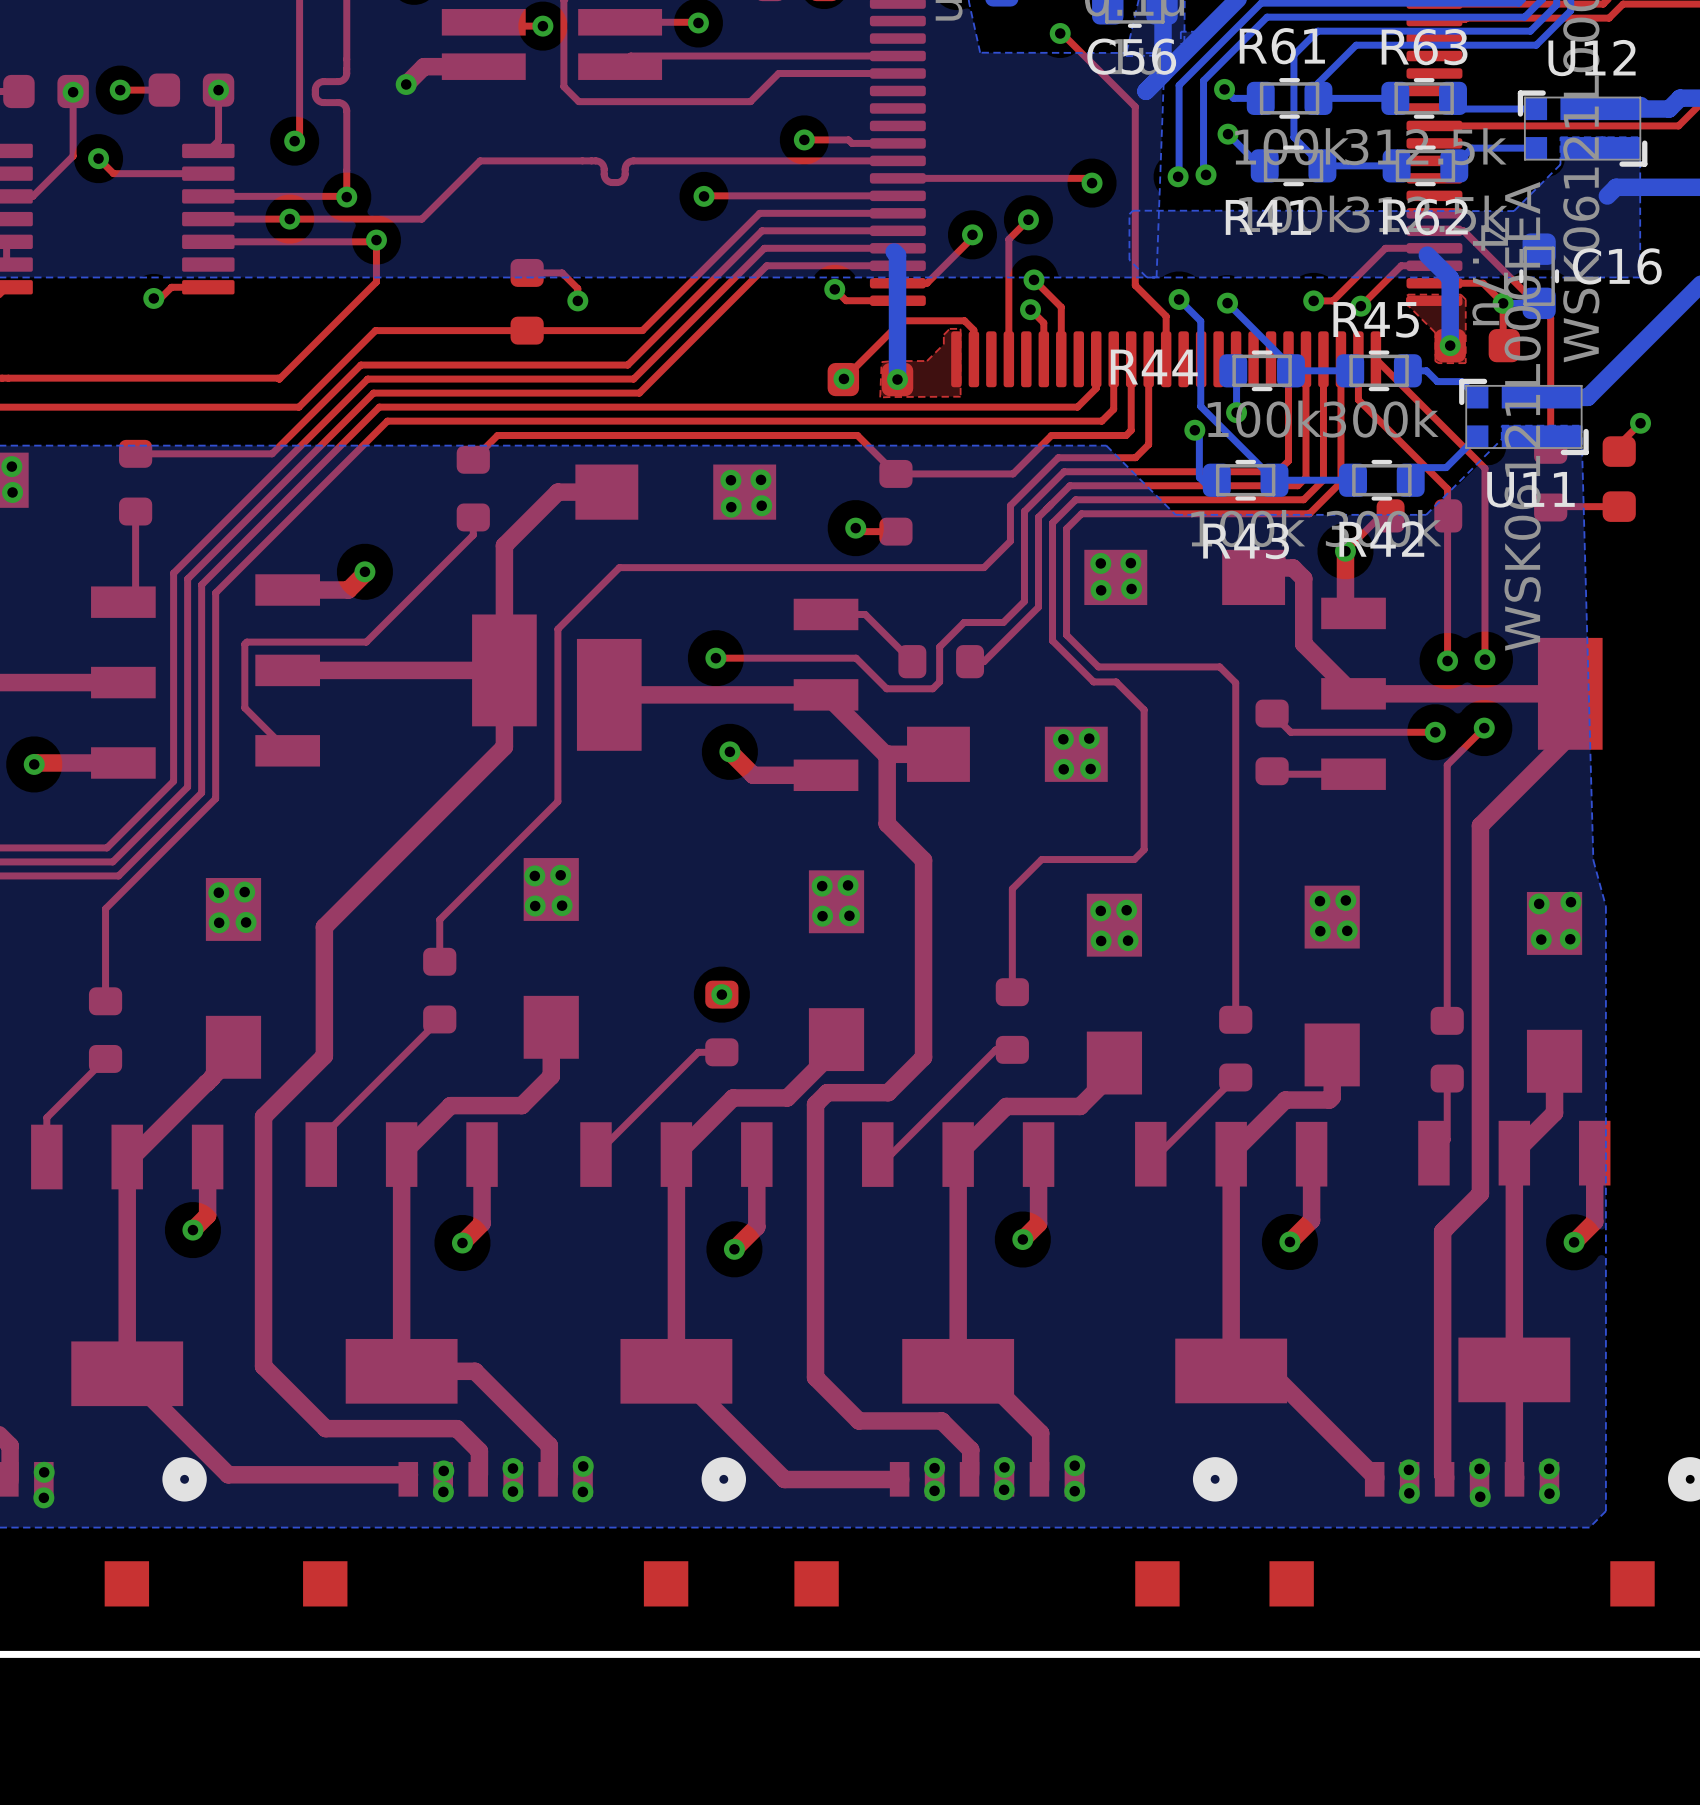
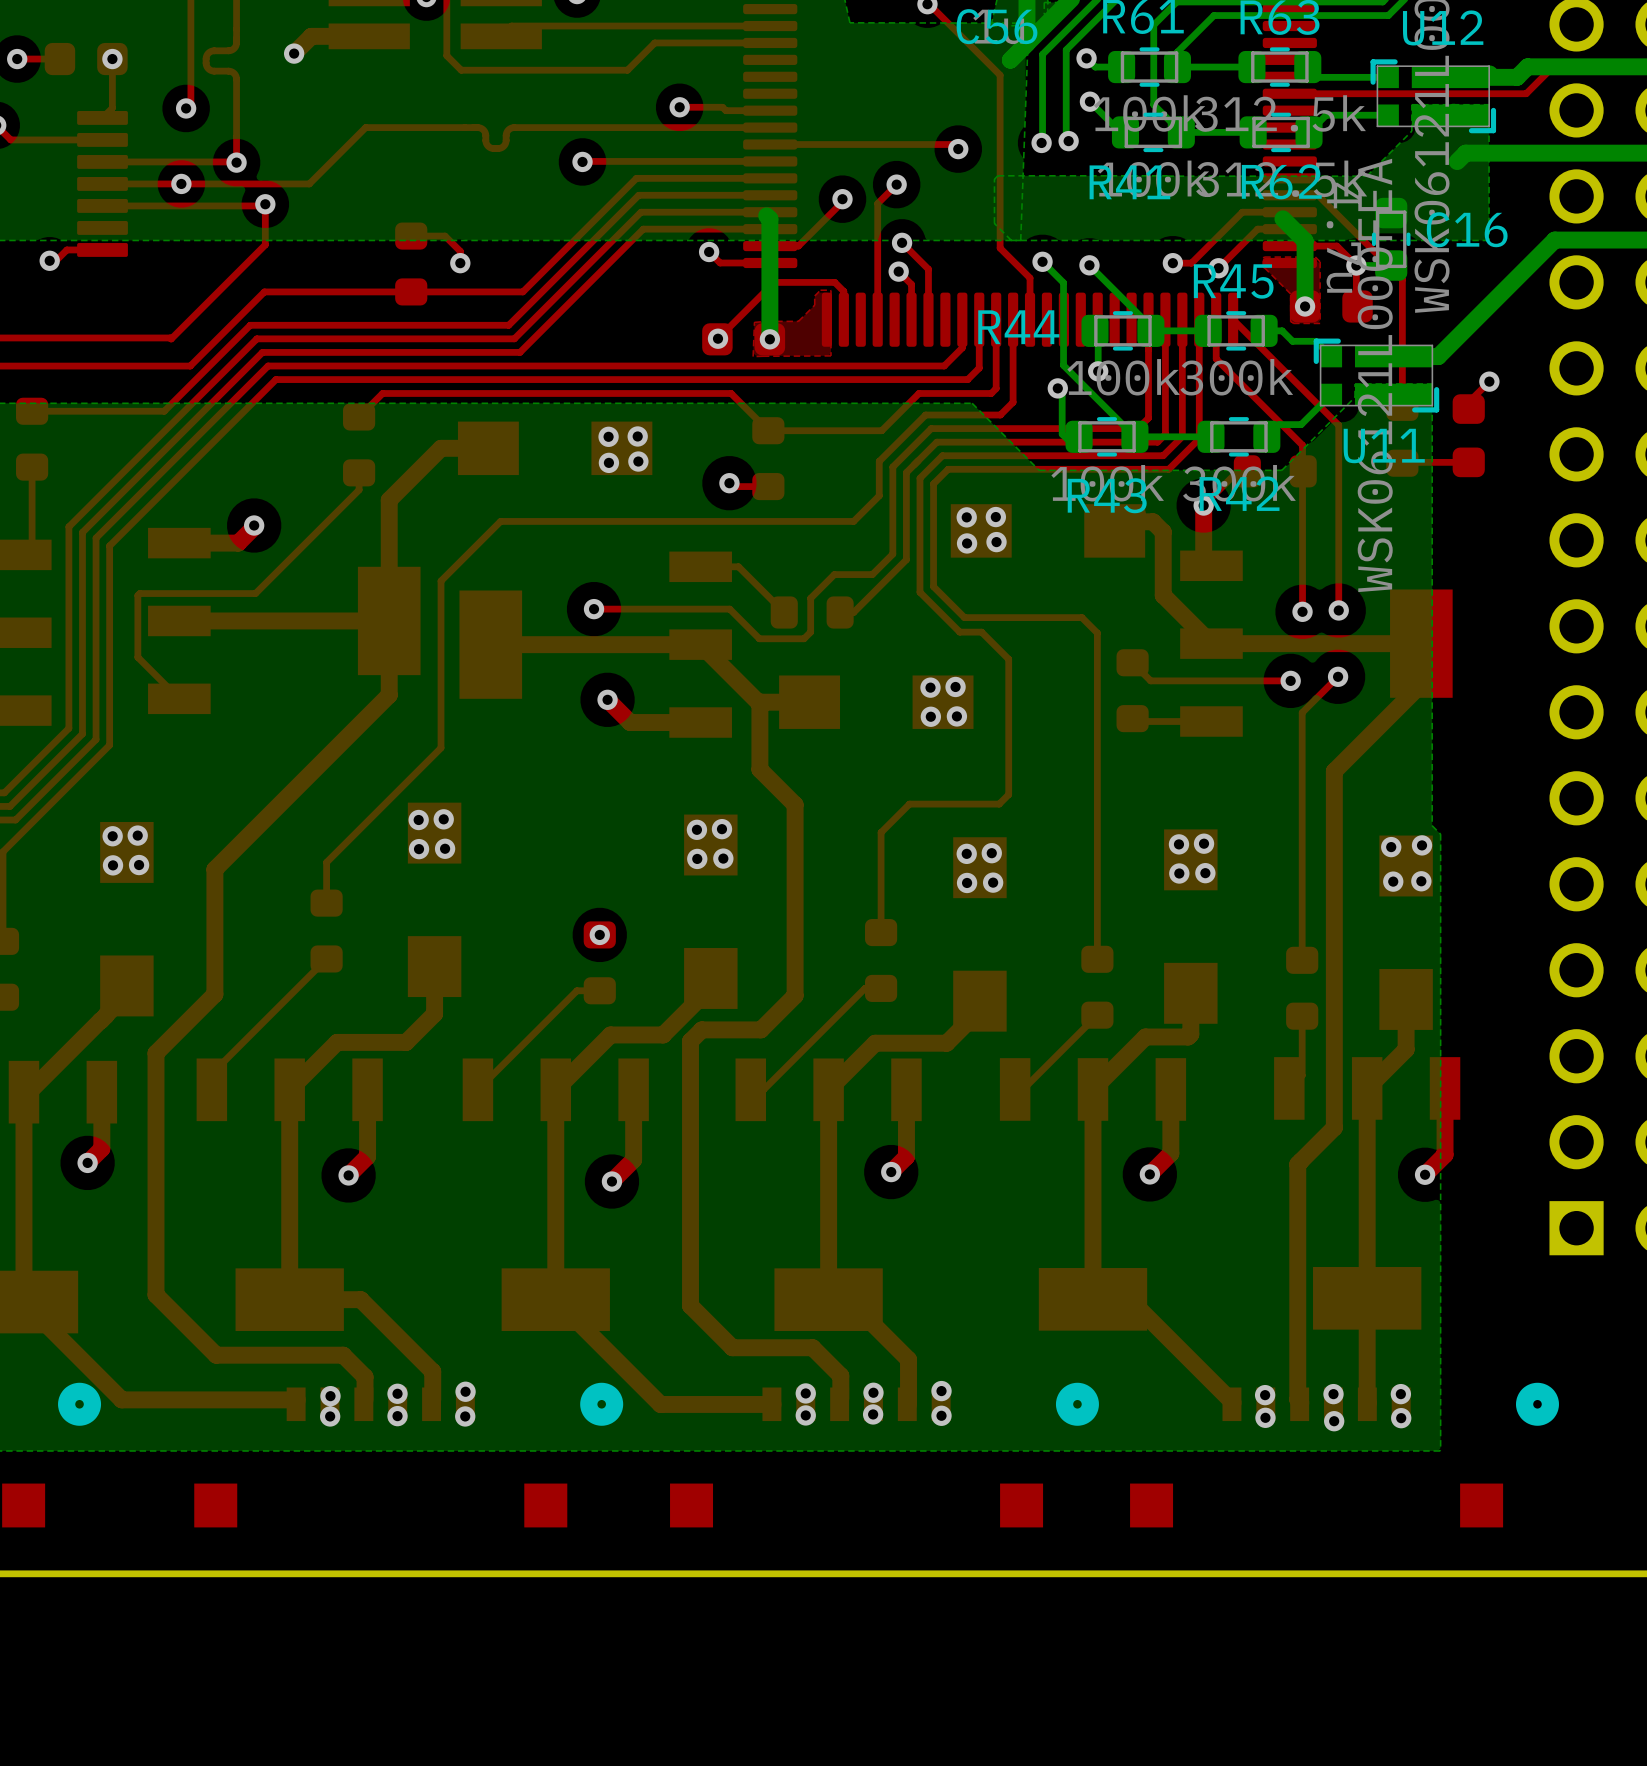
bottom zone outline: (1581, 425) (1593, 860) (1605, 906) (1605, 1511) (1590, 1526) -> (1432, 384) (1432, 825) (1440, 834) (1440, 1450)

